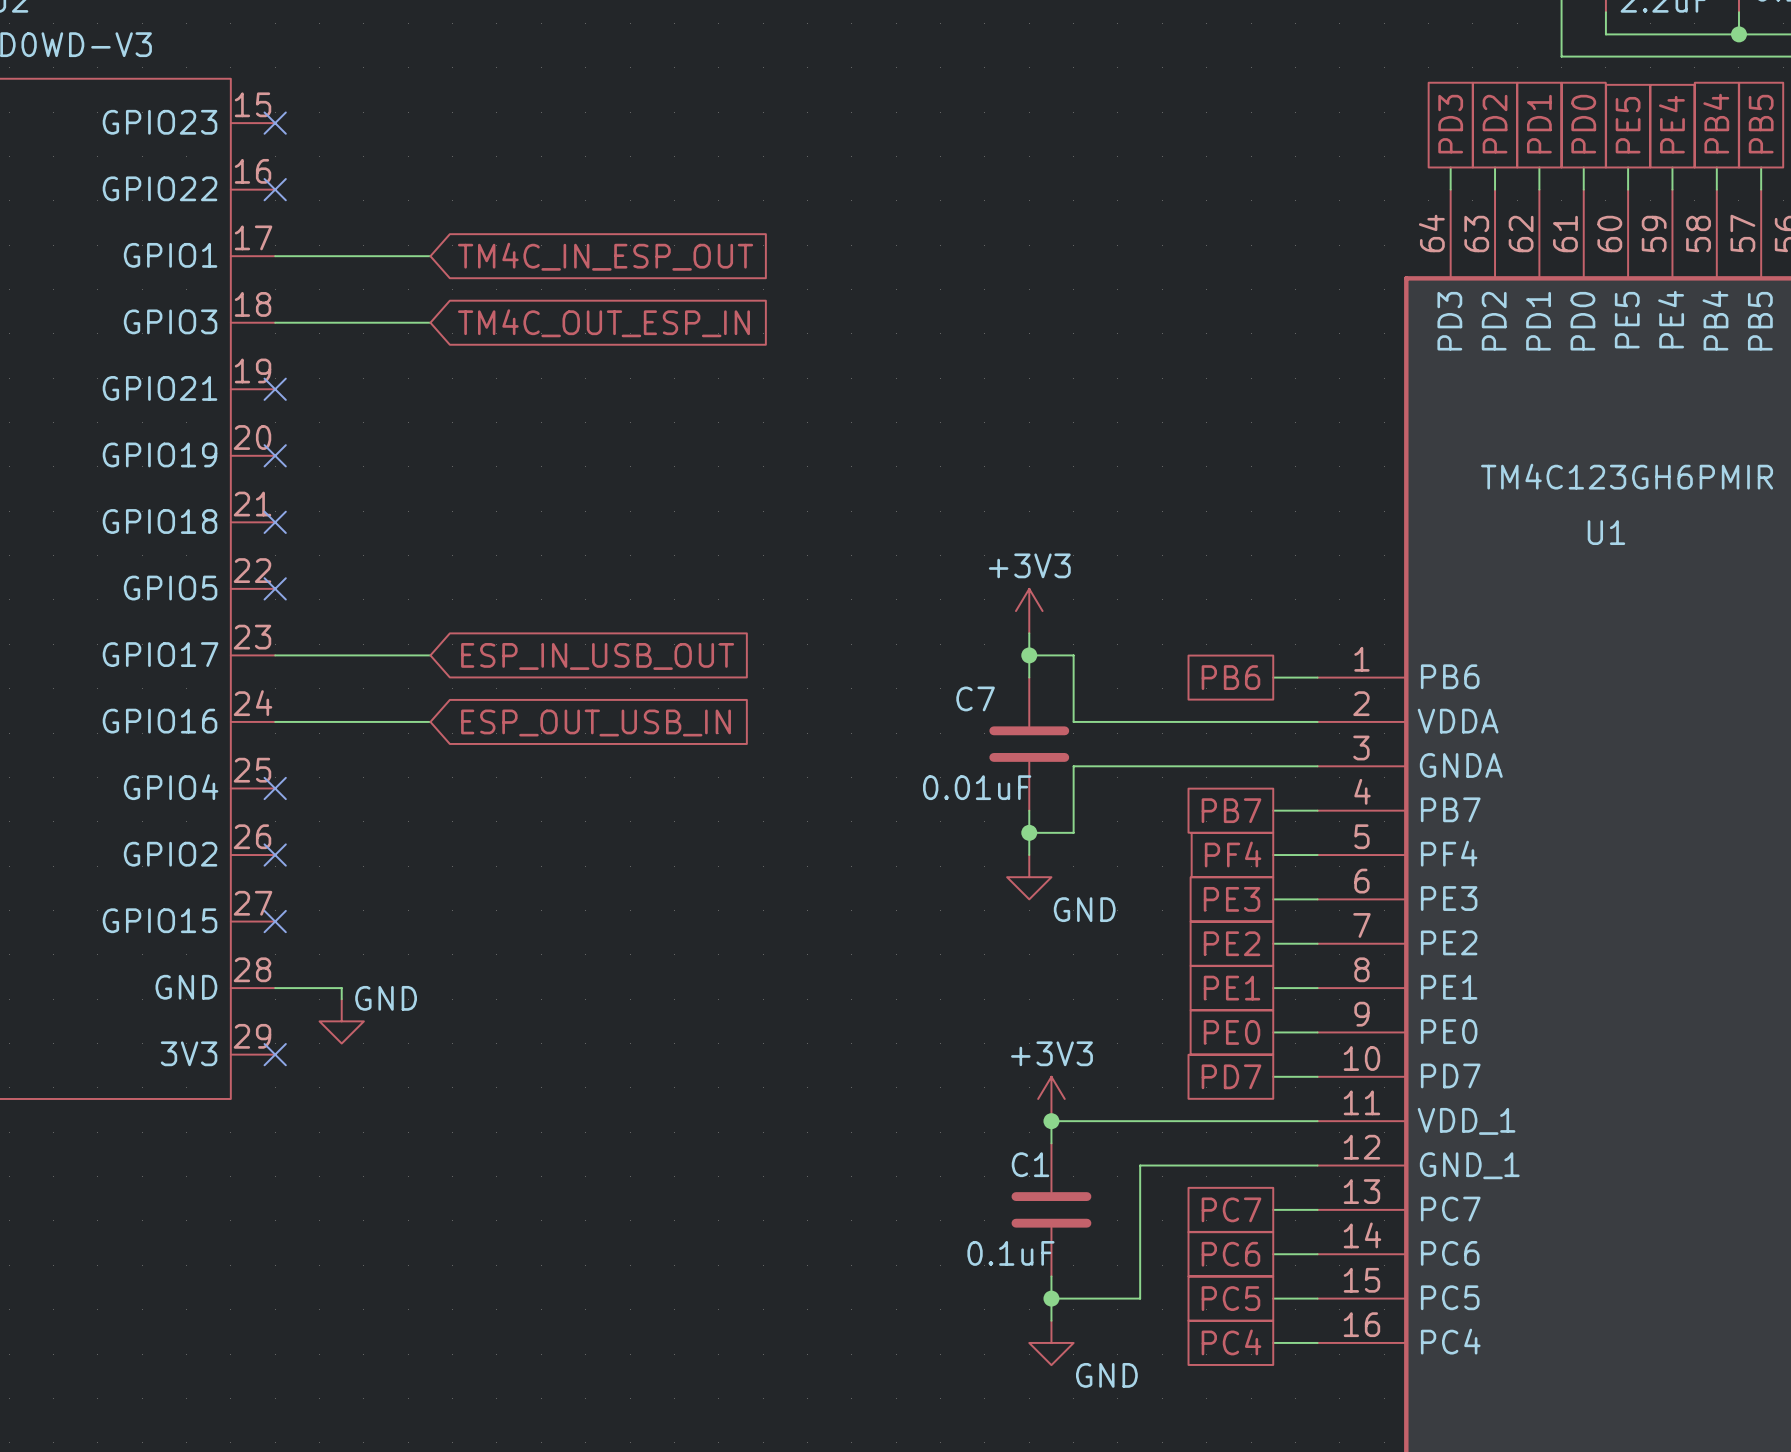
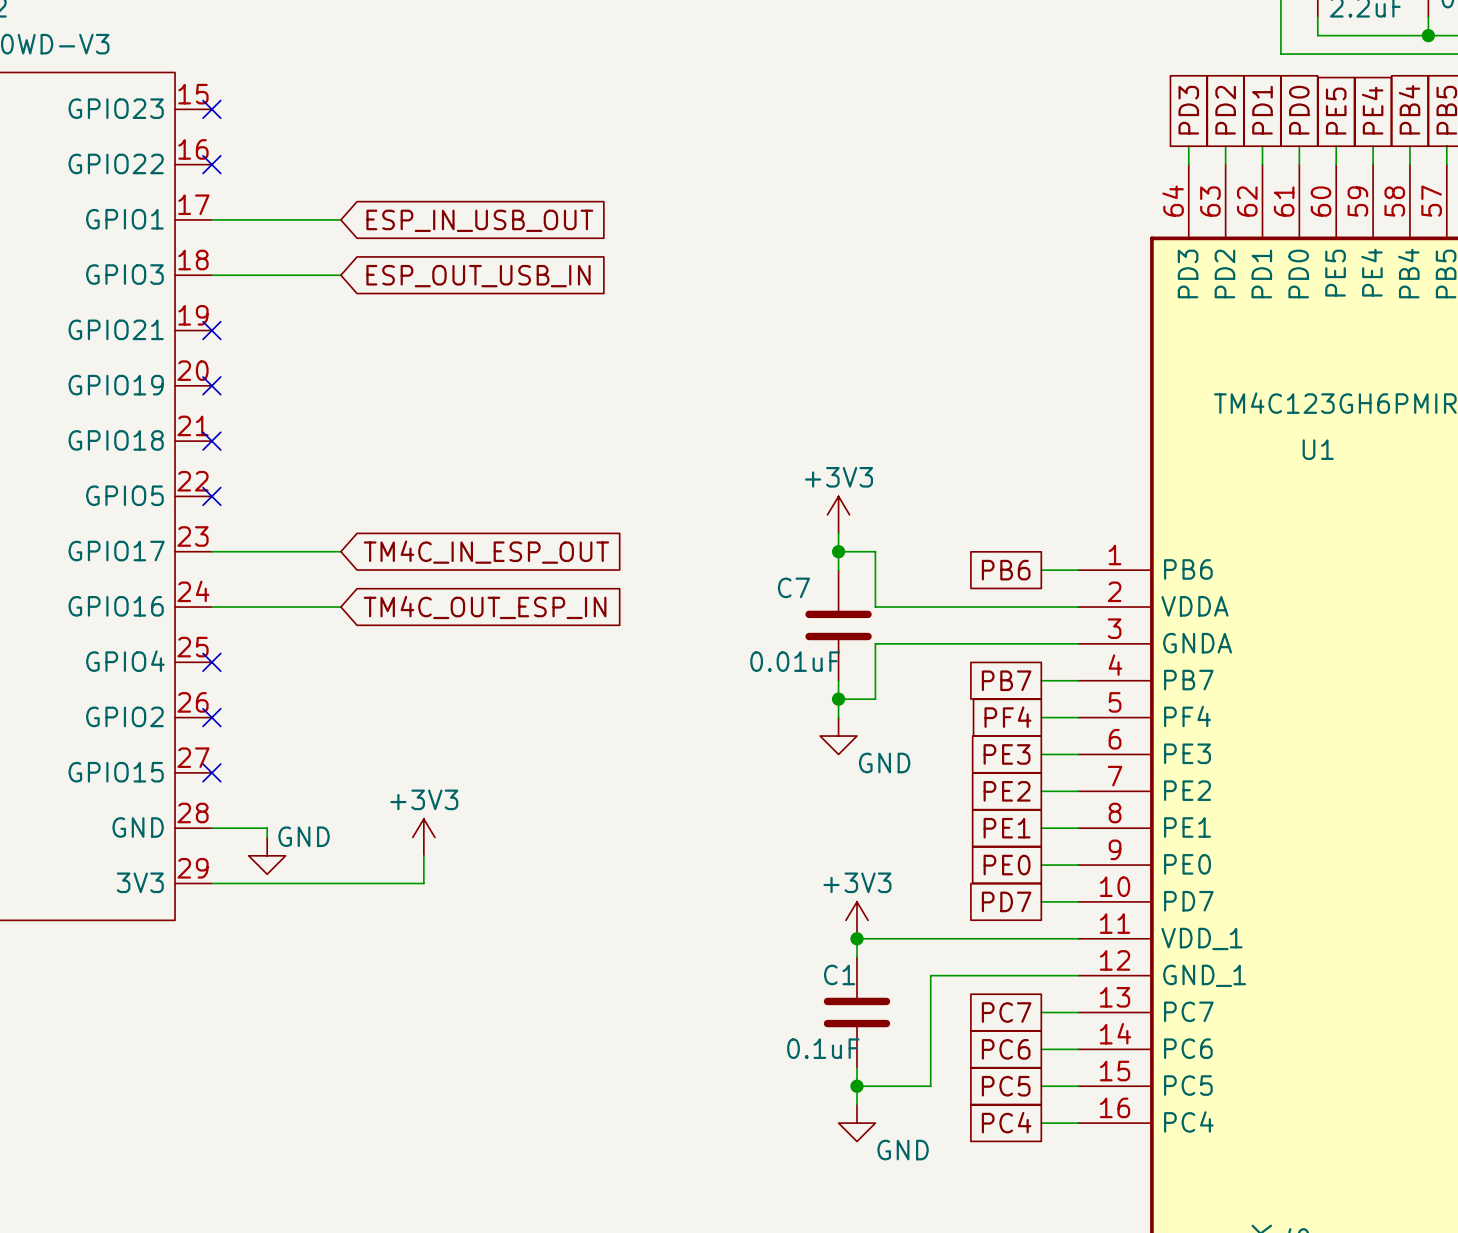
global label: TM4C_IN_ESP_OUT (605, 256) -> ESP_IN_USB_OUT (479, 220)
global label: TM4C_OUT_ESP_IN (603, 323) -> ESP_OUT_USB_IN (478, 276)
global label: ESP_IN_USB_OUT (597, 656) -> TM4C_IN_ESP_OUT (486, 552)
global label: ESP_OUT_USB_IN (596, 723) -> TM4C_OUT_ESP_IN (485, 607)
power symbol: none -> +3V3 (423, 837)
wire: none -> (423, 855) (423, 883) (211, 883)
no-connect mark: (275, 1054) -> none

